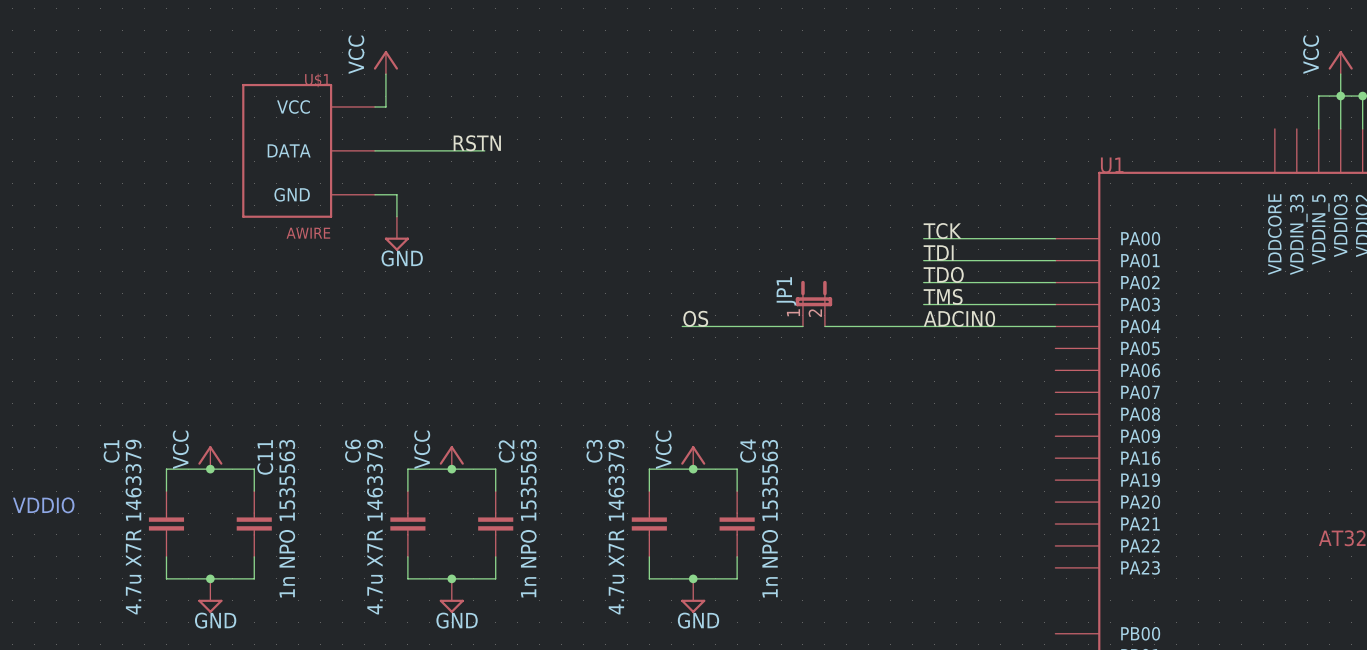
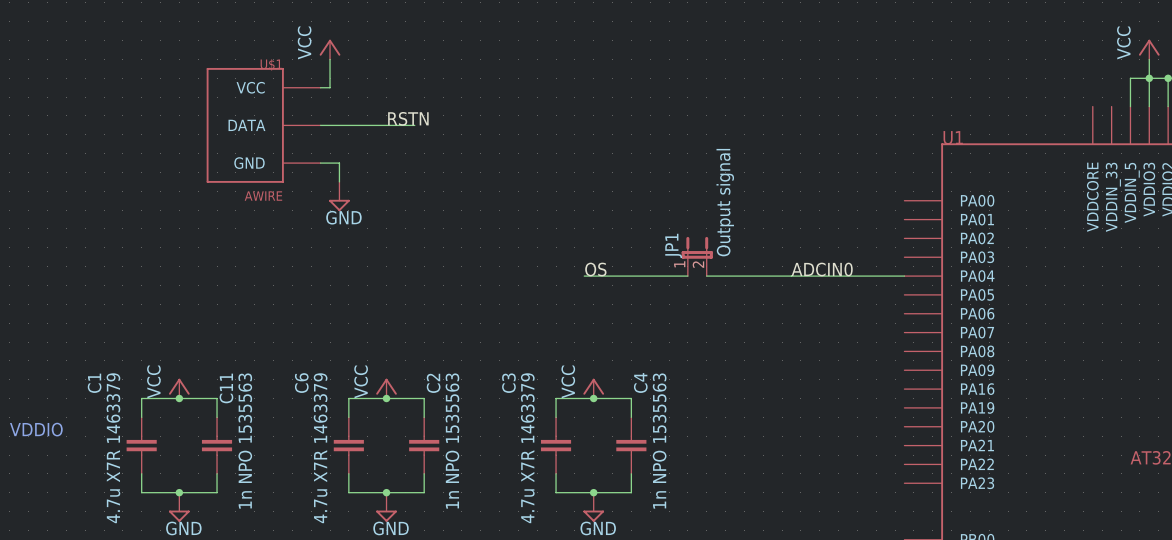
label: TCK (942, 231) -> none
wire: (923, 238) (1055, 238) -> none
JP1 value: none -> Output signal (725, 202)
label: TDI (938, 252) -> none
wire: (923, 260) (1055, 260) -> none
label: TDO (943, 274) -> none
wire: (923, 282) (1055, 282) -> none
label: TMS (943, 296) -> none
wire: (923, 304) (1055, 304) -> none

